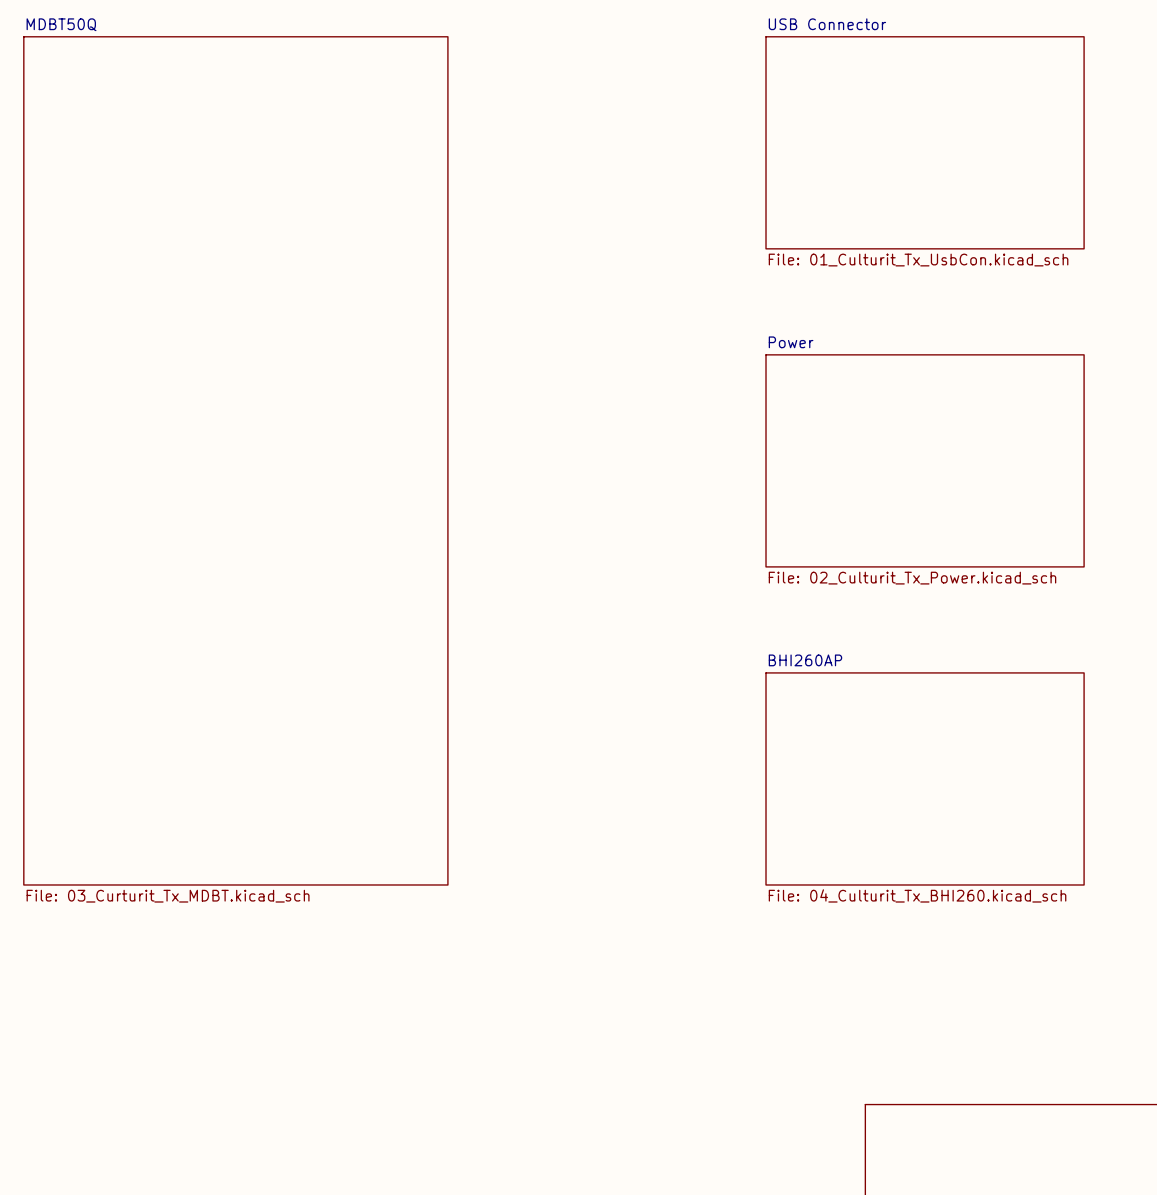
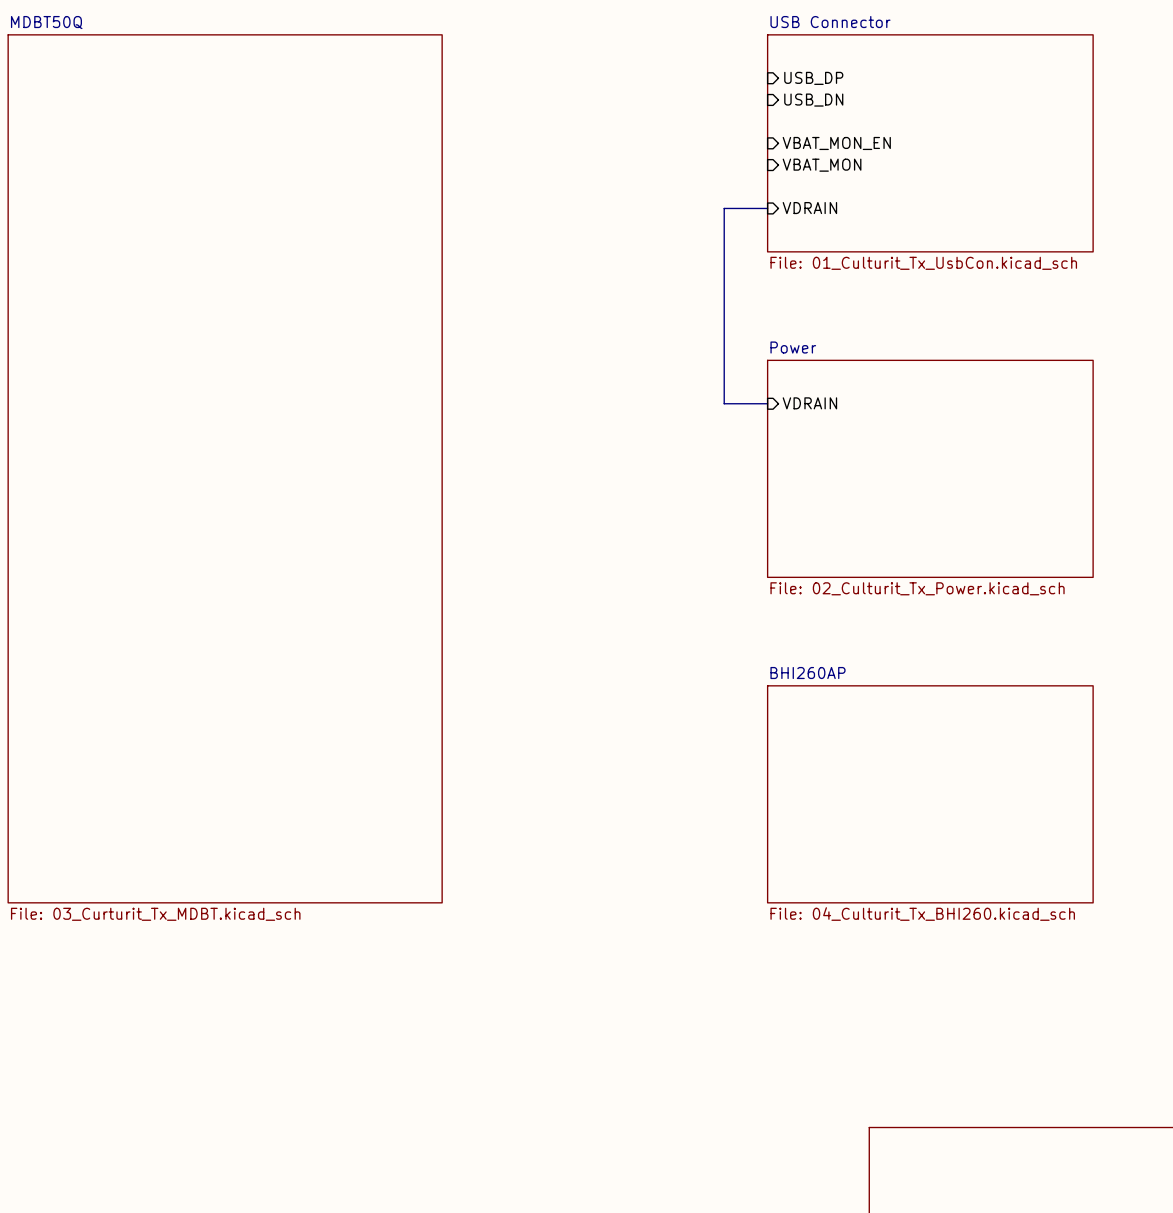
sheet pin: none -> USB_DP (813, 78)
sheet pin: none -> USB_DN (813, 100)
sheet pin: none -> VBAT_MON_EN (836, 143)
sheet pin: none -> VBAT_MON (822, 165)
wire: none -> (767, 208) (724, 208) (724, 403) (767, 403)
sheet pin: none -> VDRAIN (809, 208)
sheet pin: none -> VDRAIN (809, 403)

